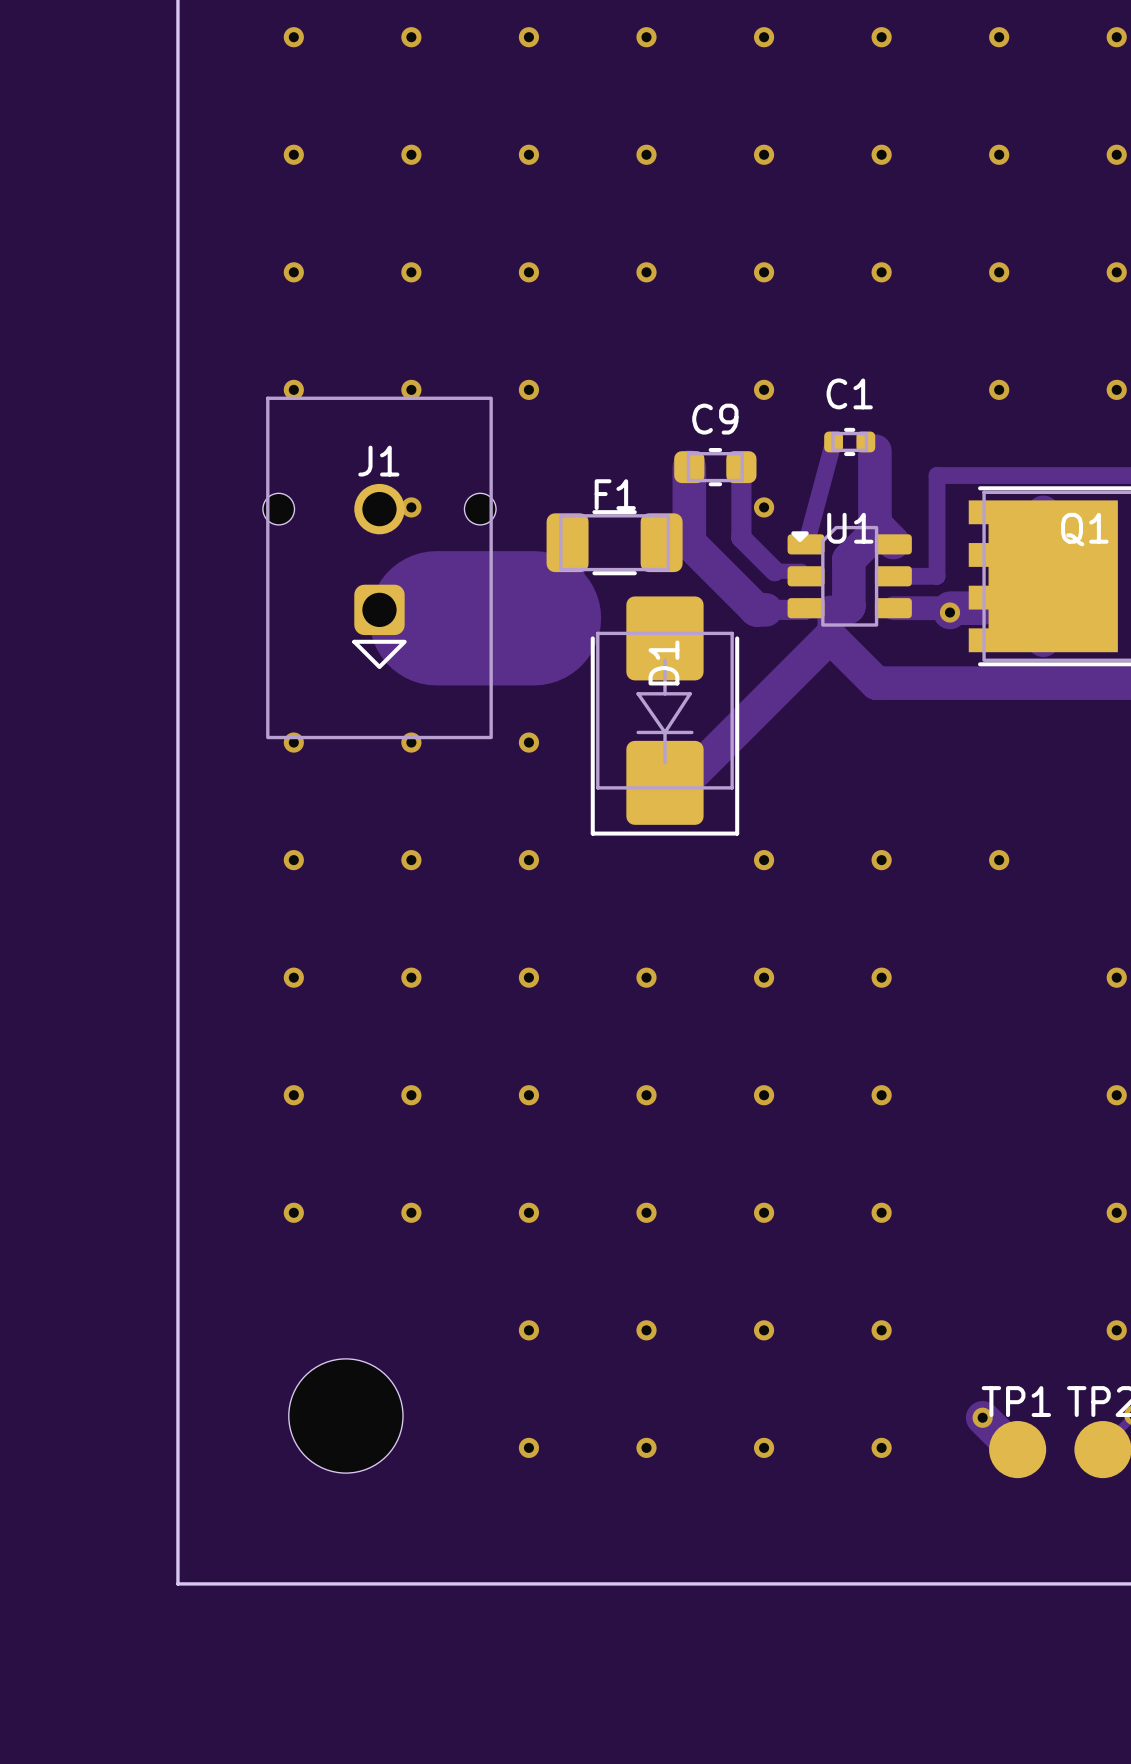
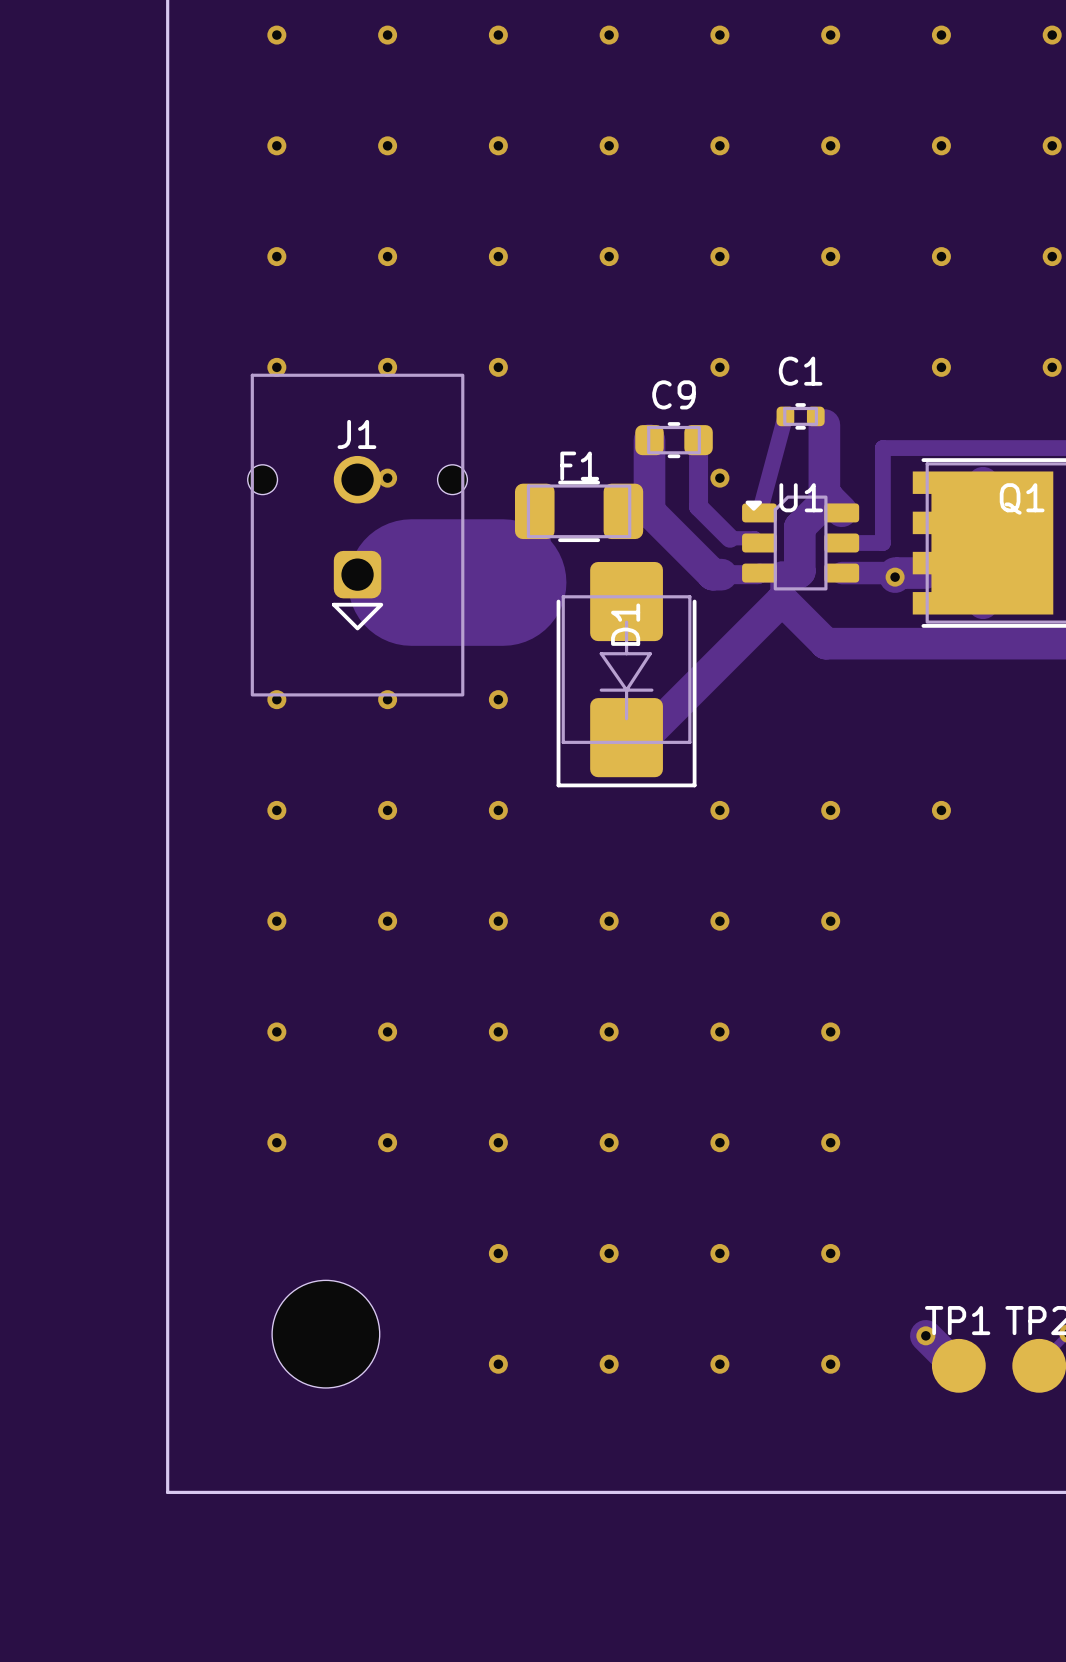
via: (1116, 977) -> none
via: (1116, 1095) -> none
via: (1116, 1212) -> none
via: (1116, 1330) -> none

